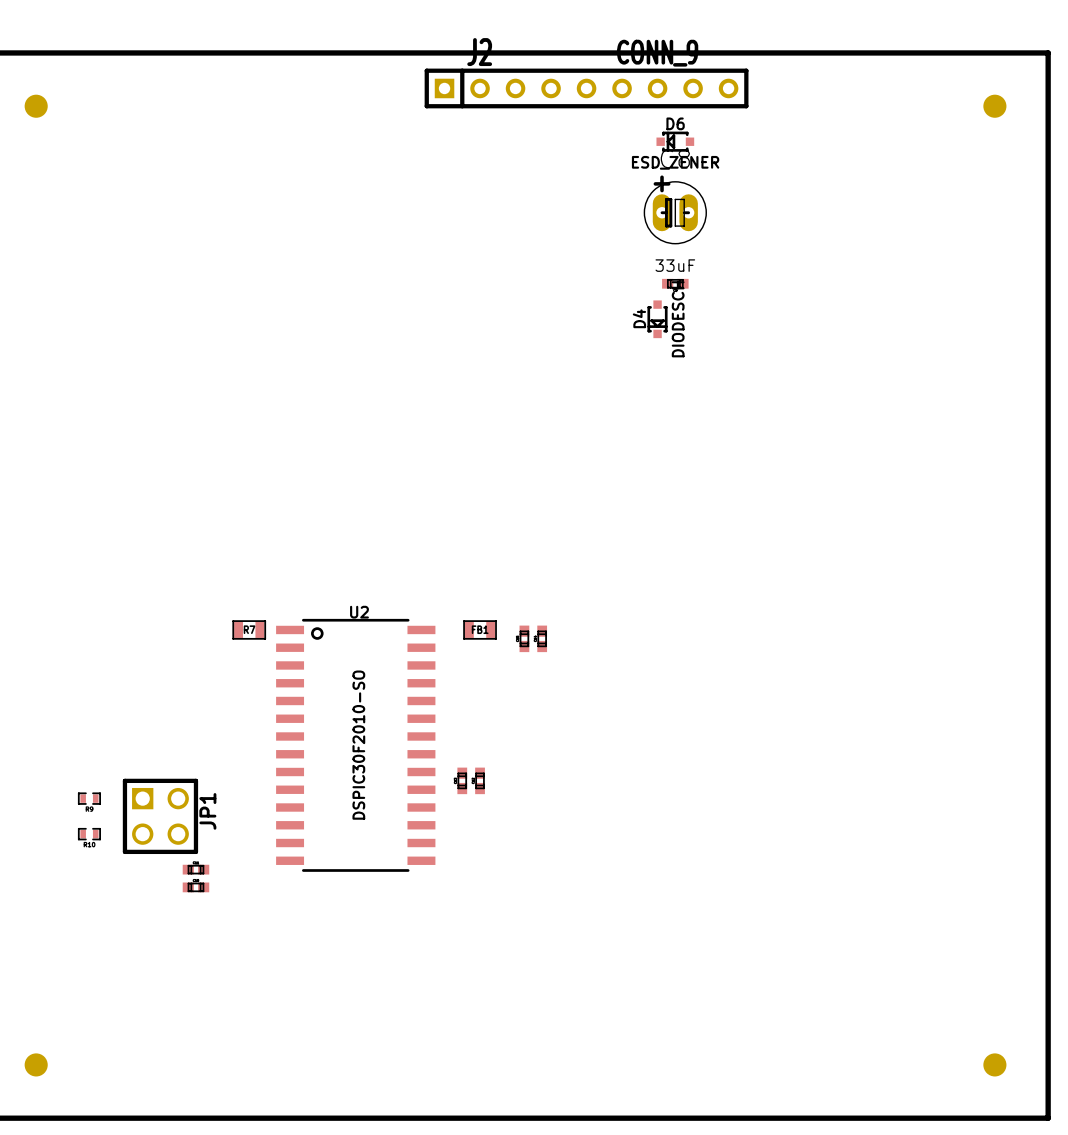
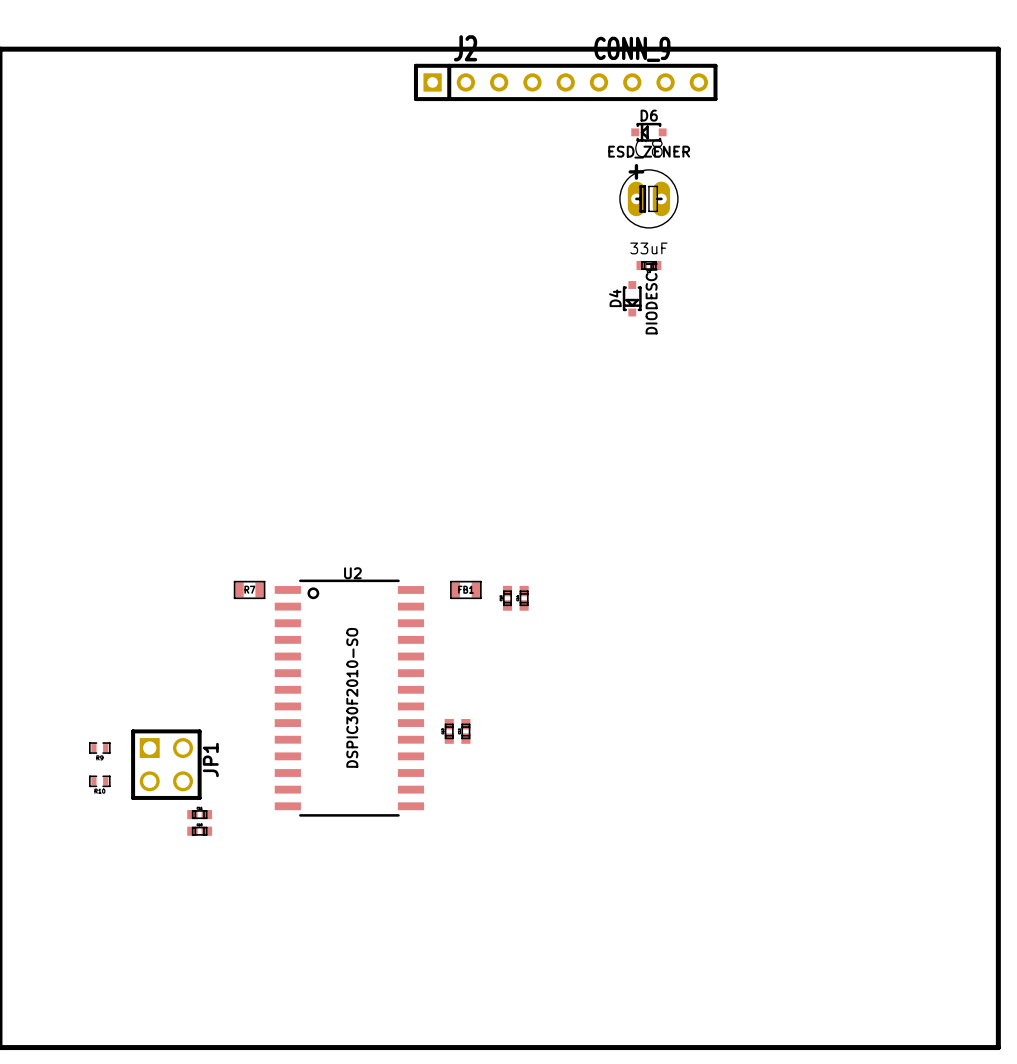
part: (36, 106) -> none
part: (994, 106) -> none
part: (36, 1064) -> none
part: (994, 1064) -> none

